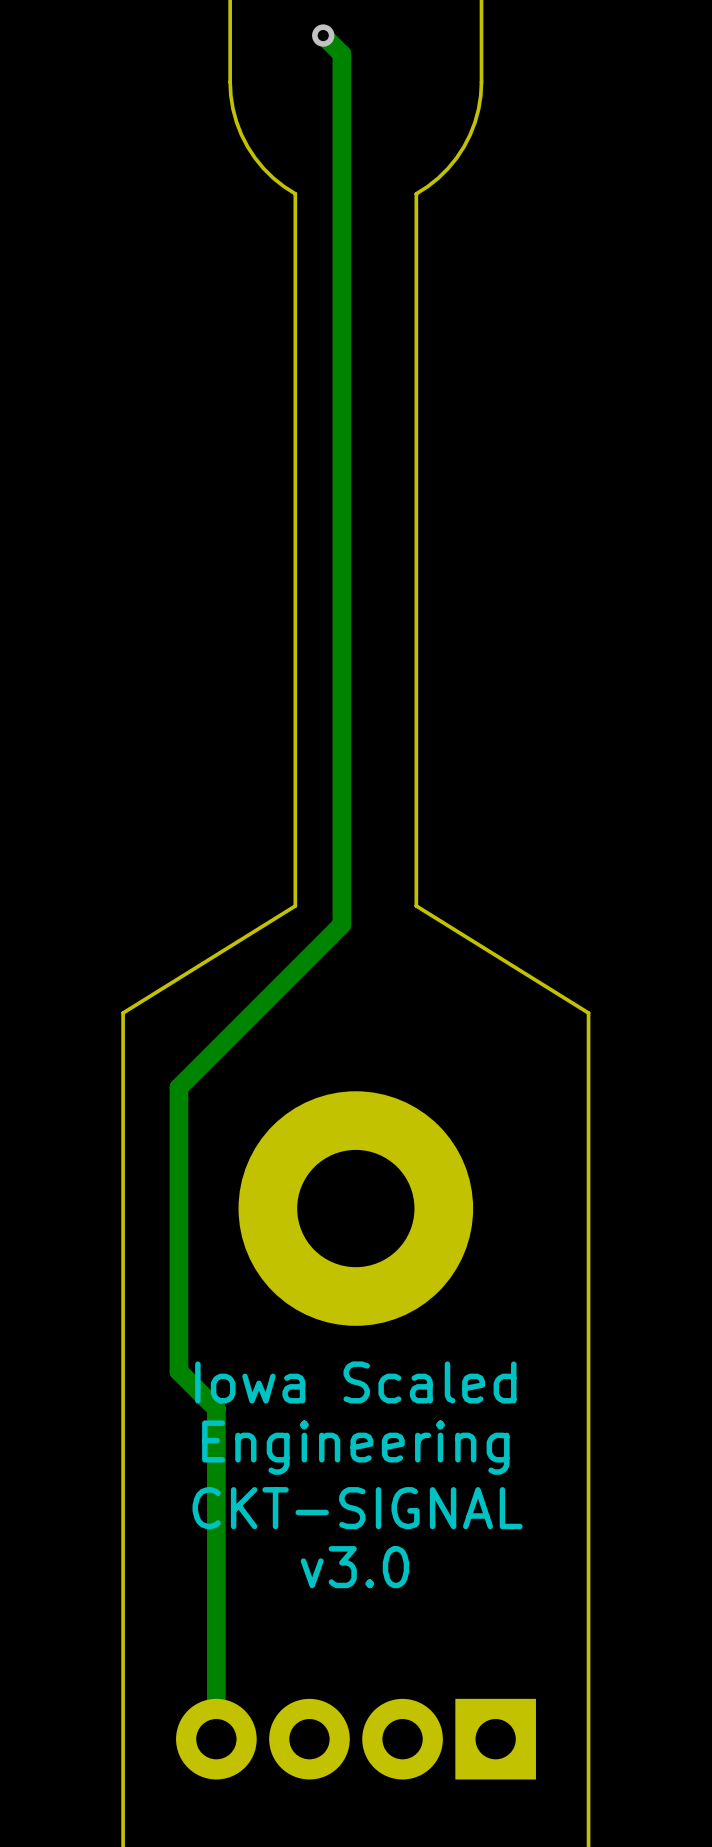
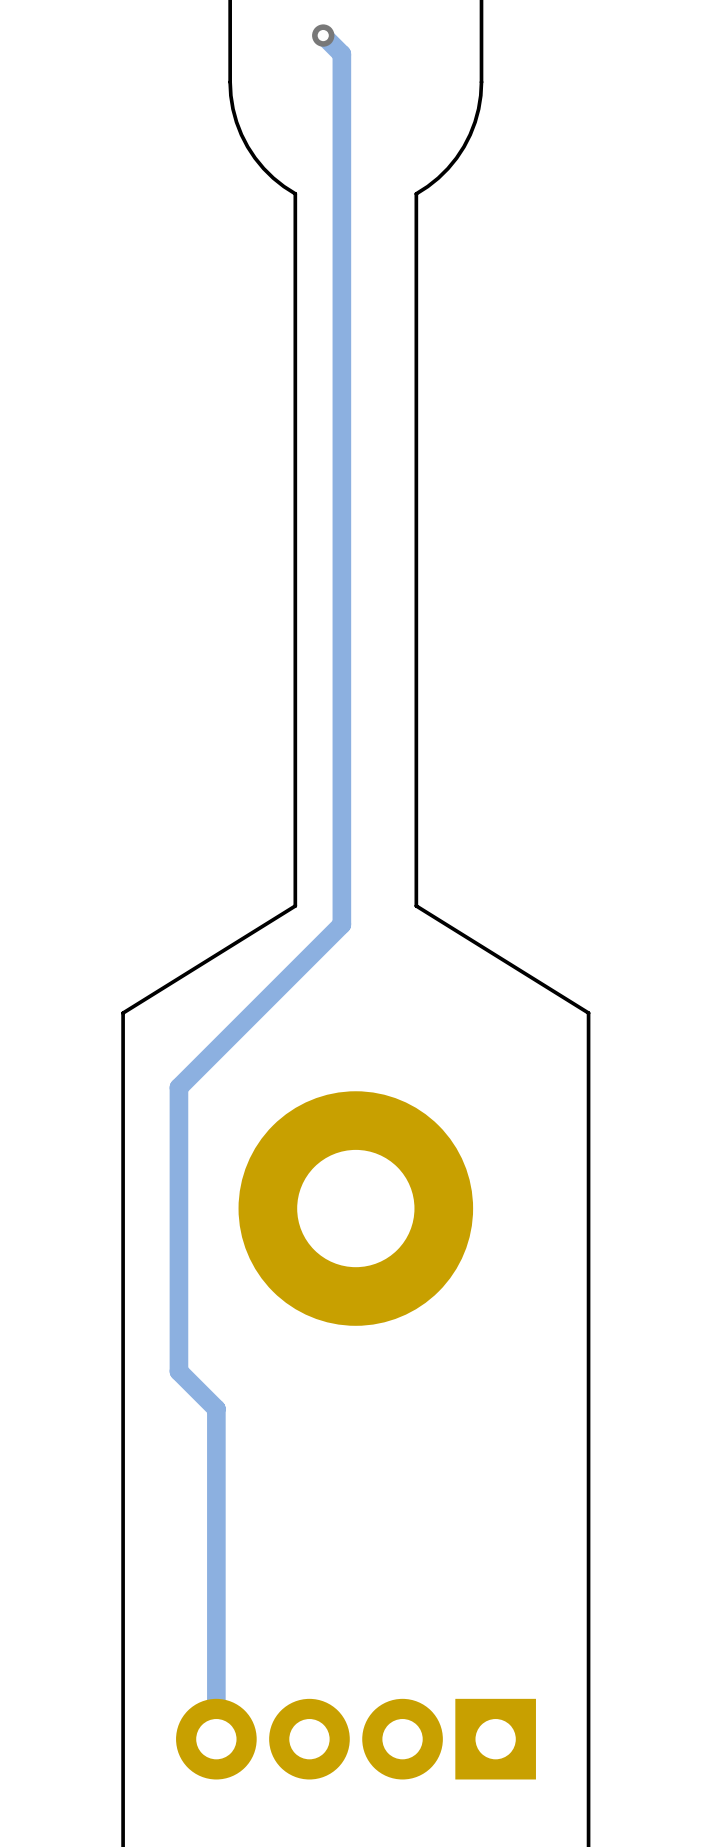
text: Iowa Scaled (355, 1382) -> none
text: Engineering (355, 1447) -> none
text: CKT-SIGNAL (357, 1508) -> none
text: v3.0 (354, 1567) -> none

